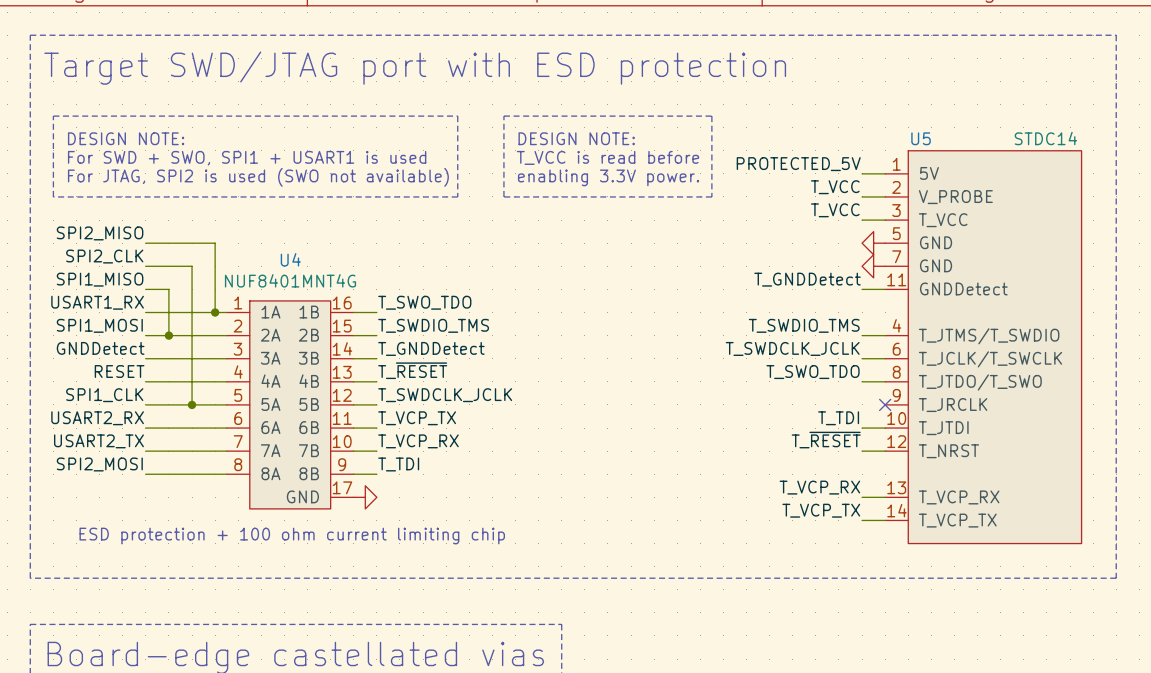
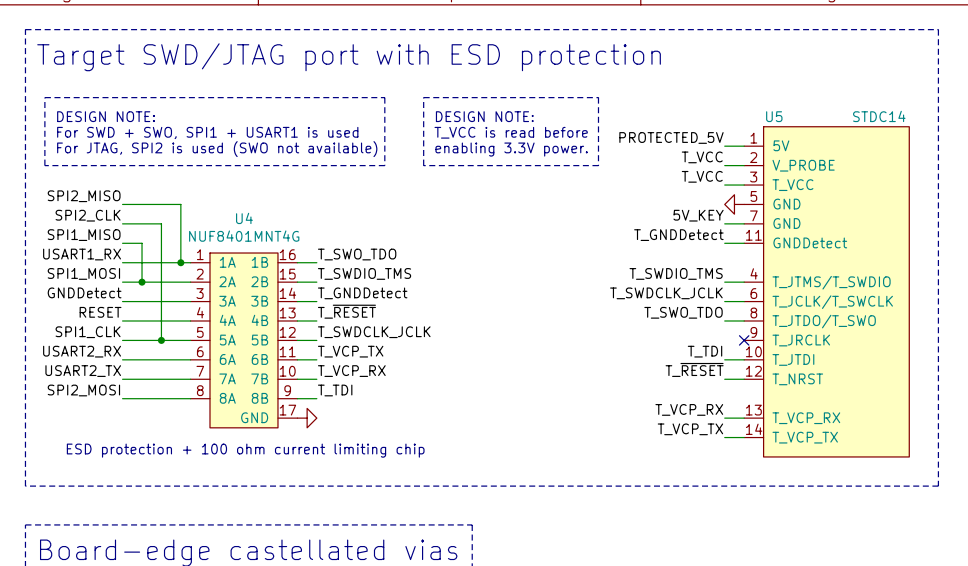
label: none -> 5V_KEY (698, 215)
power symbol: (873, 266) -> none

